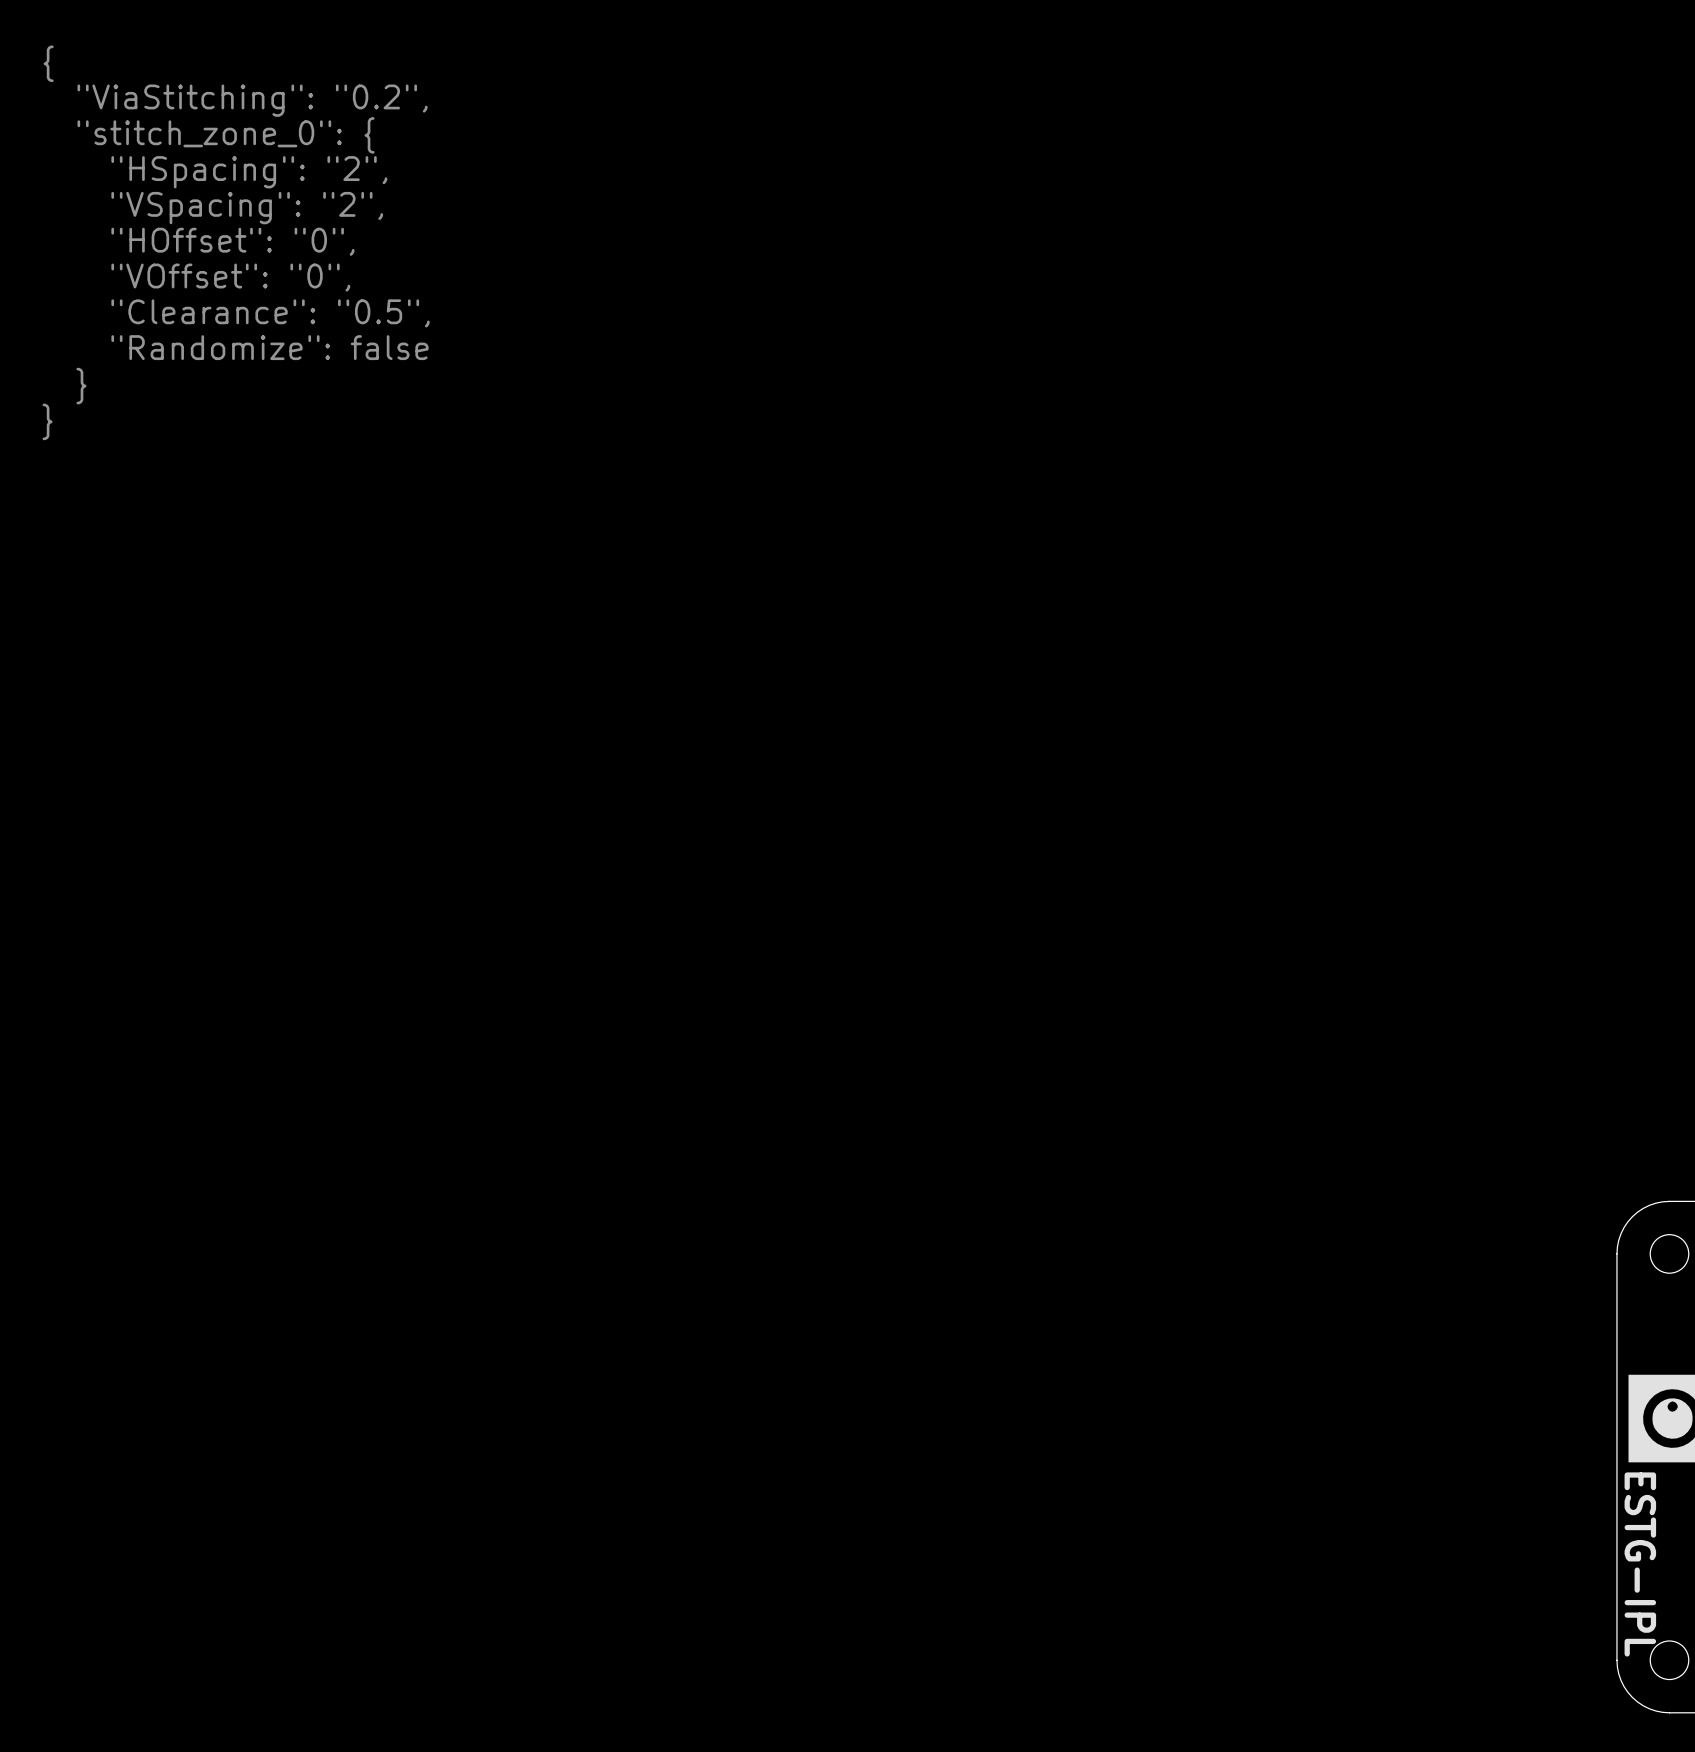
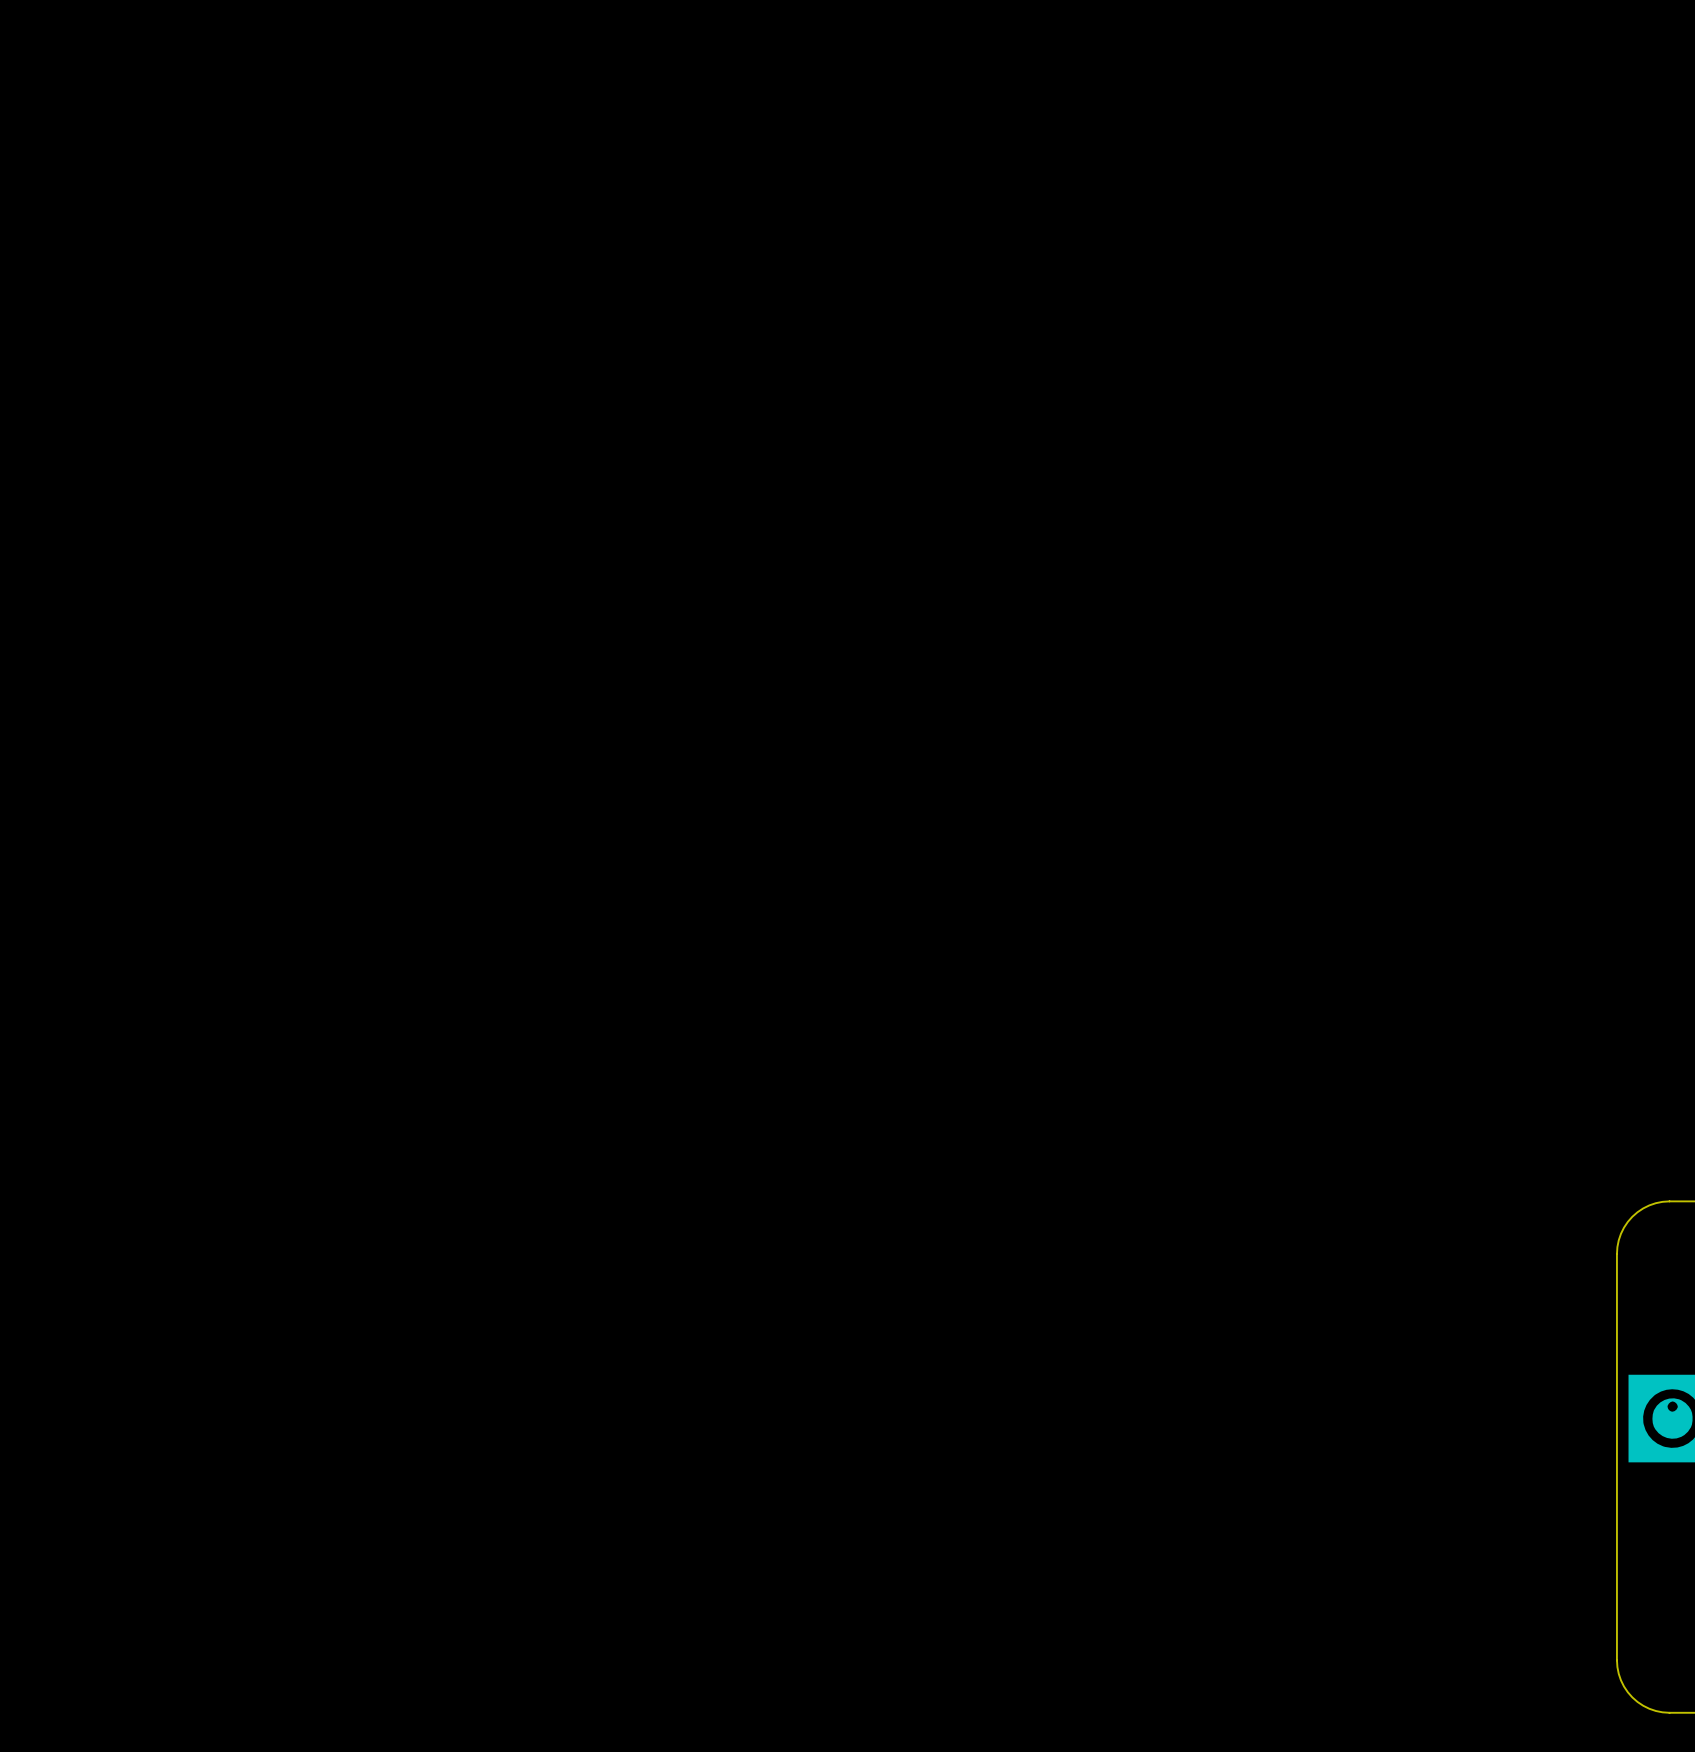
text: { (48, 63) -> none
text: "ViaStitching": "0.2", (252, 100) -> none
text: "stitch_zone_0": { (226, 135) -> none
text: "HSpacing": "2", (249, 172) -> none
text: "VSpacing": "2", (247, 208) -> none
text: "HOffset": "0", (232, 241) -> none
text: "VOffset": "0", (230, 277) -> none
text: "Clearance": "0.5", (270, 313) -> none
text: "Randomize": false (270, 347) -> none
text: } (81, 386) -> none
text: } (47, 421) -> none
round board edge: [1649, 1234, 1690, 1274] -> none
text: ESTG-IPL (1640, 1564) -> none
round board edge: [1649, 1640, 1690, 1680] -> none

